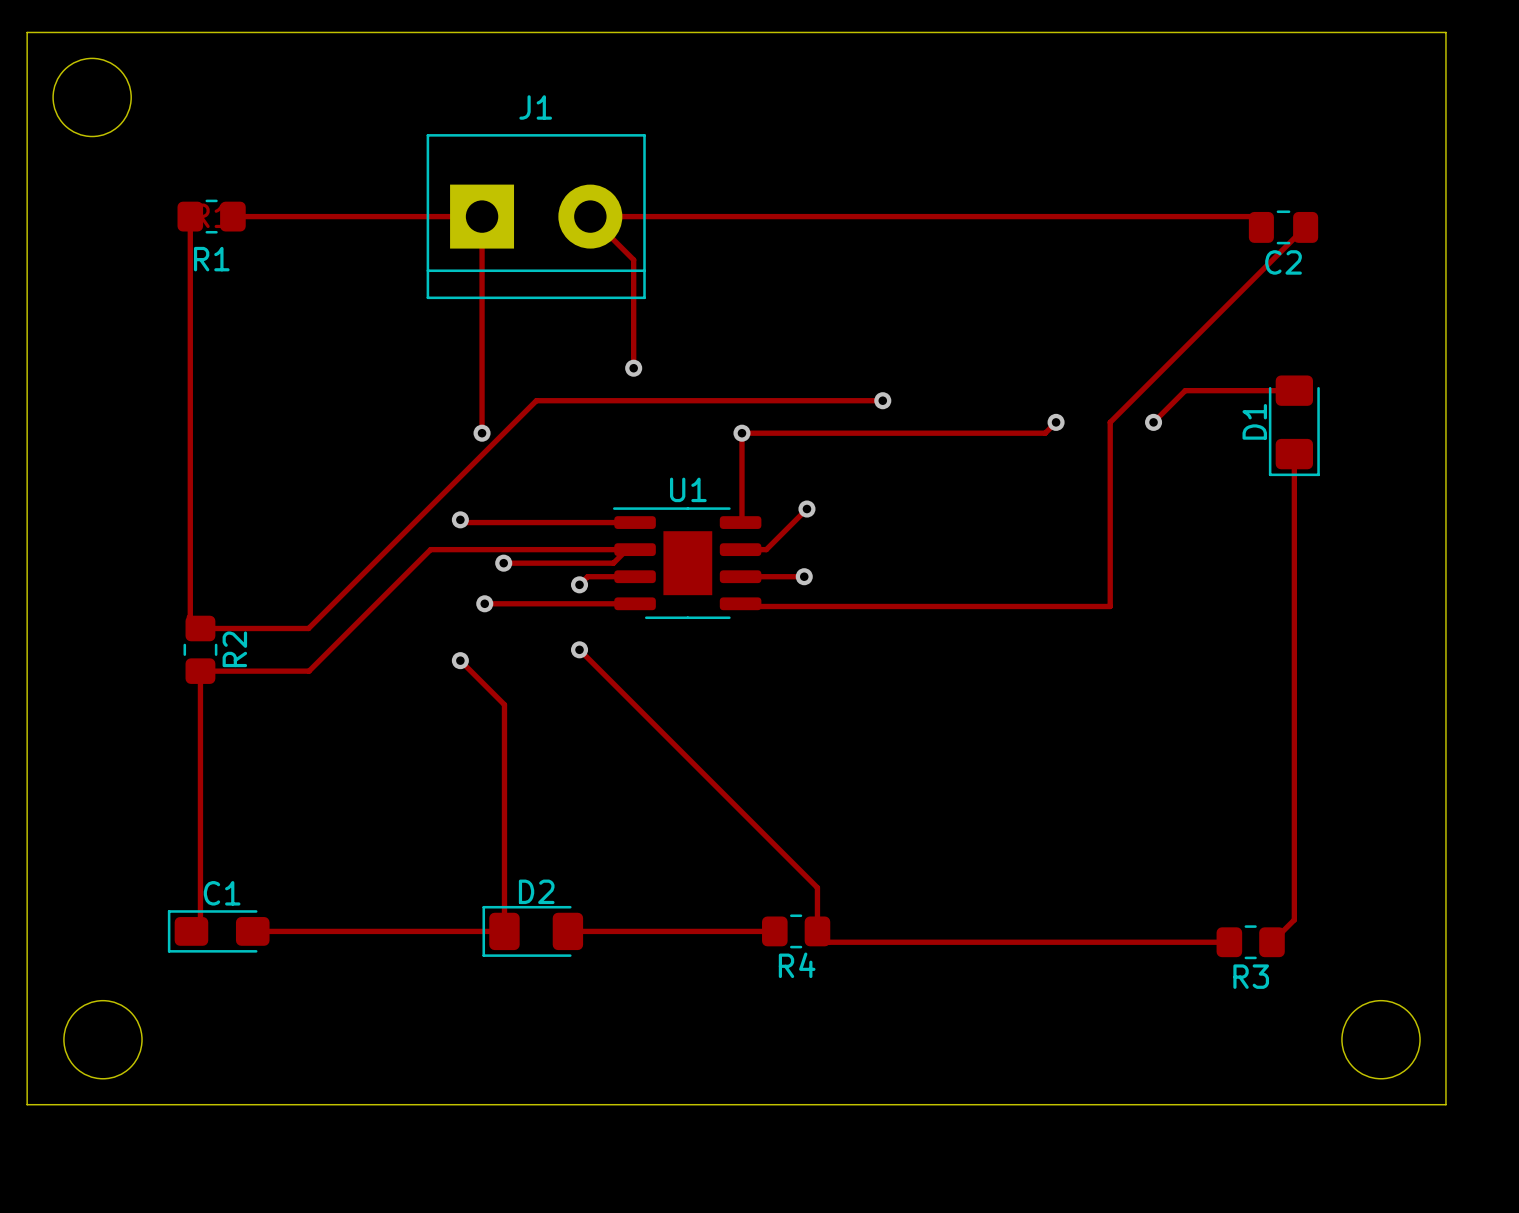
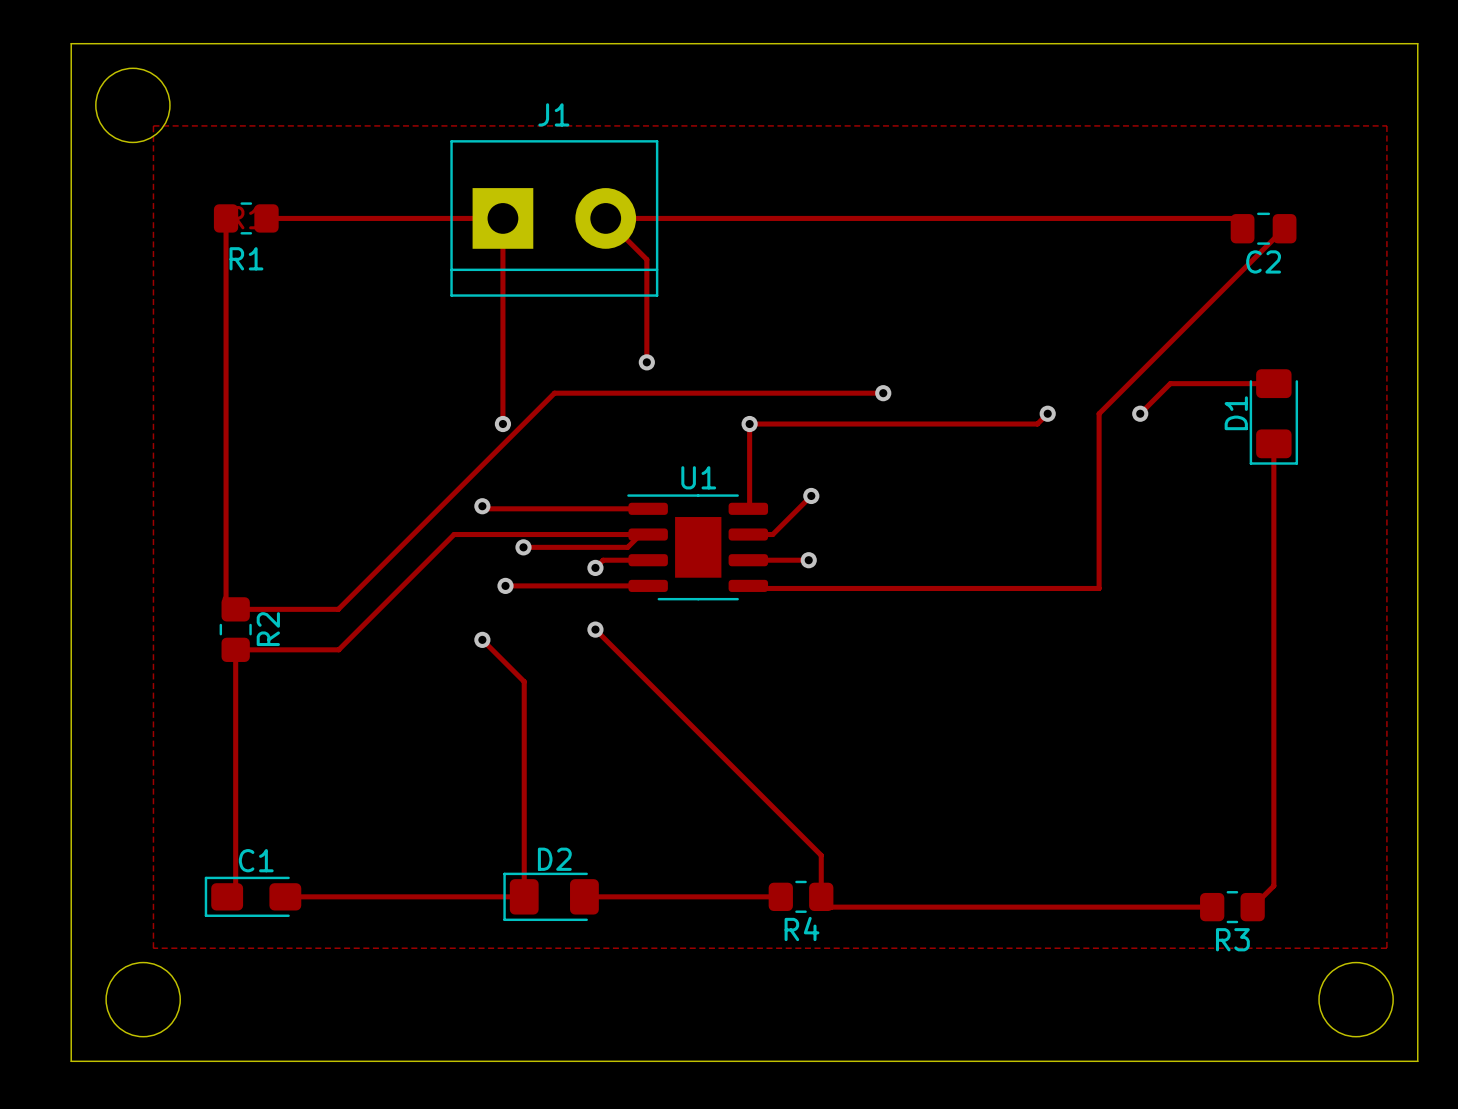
zone outline: none -> (153, 125) (153, 948) (1386, 948) (1386, 125) (153, 125)

